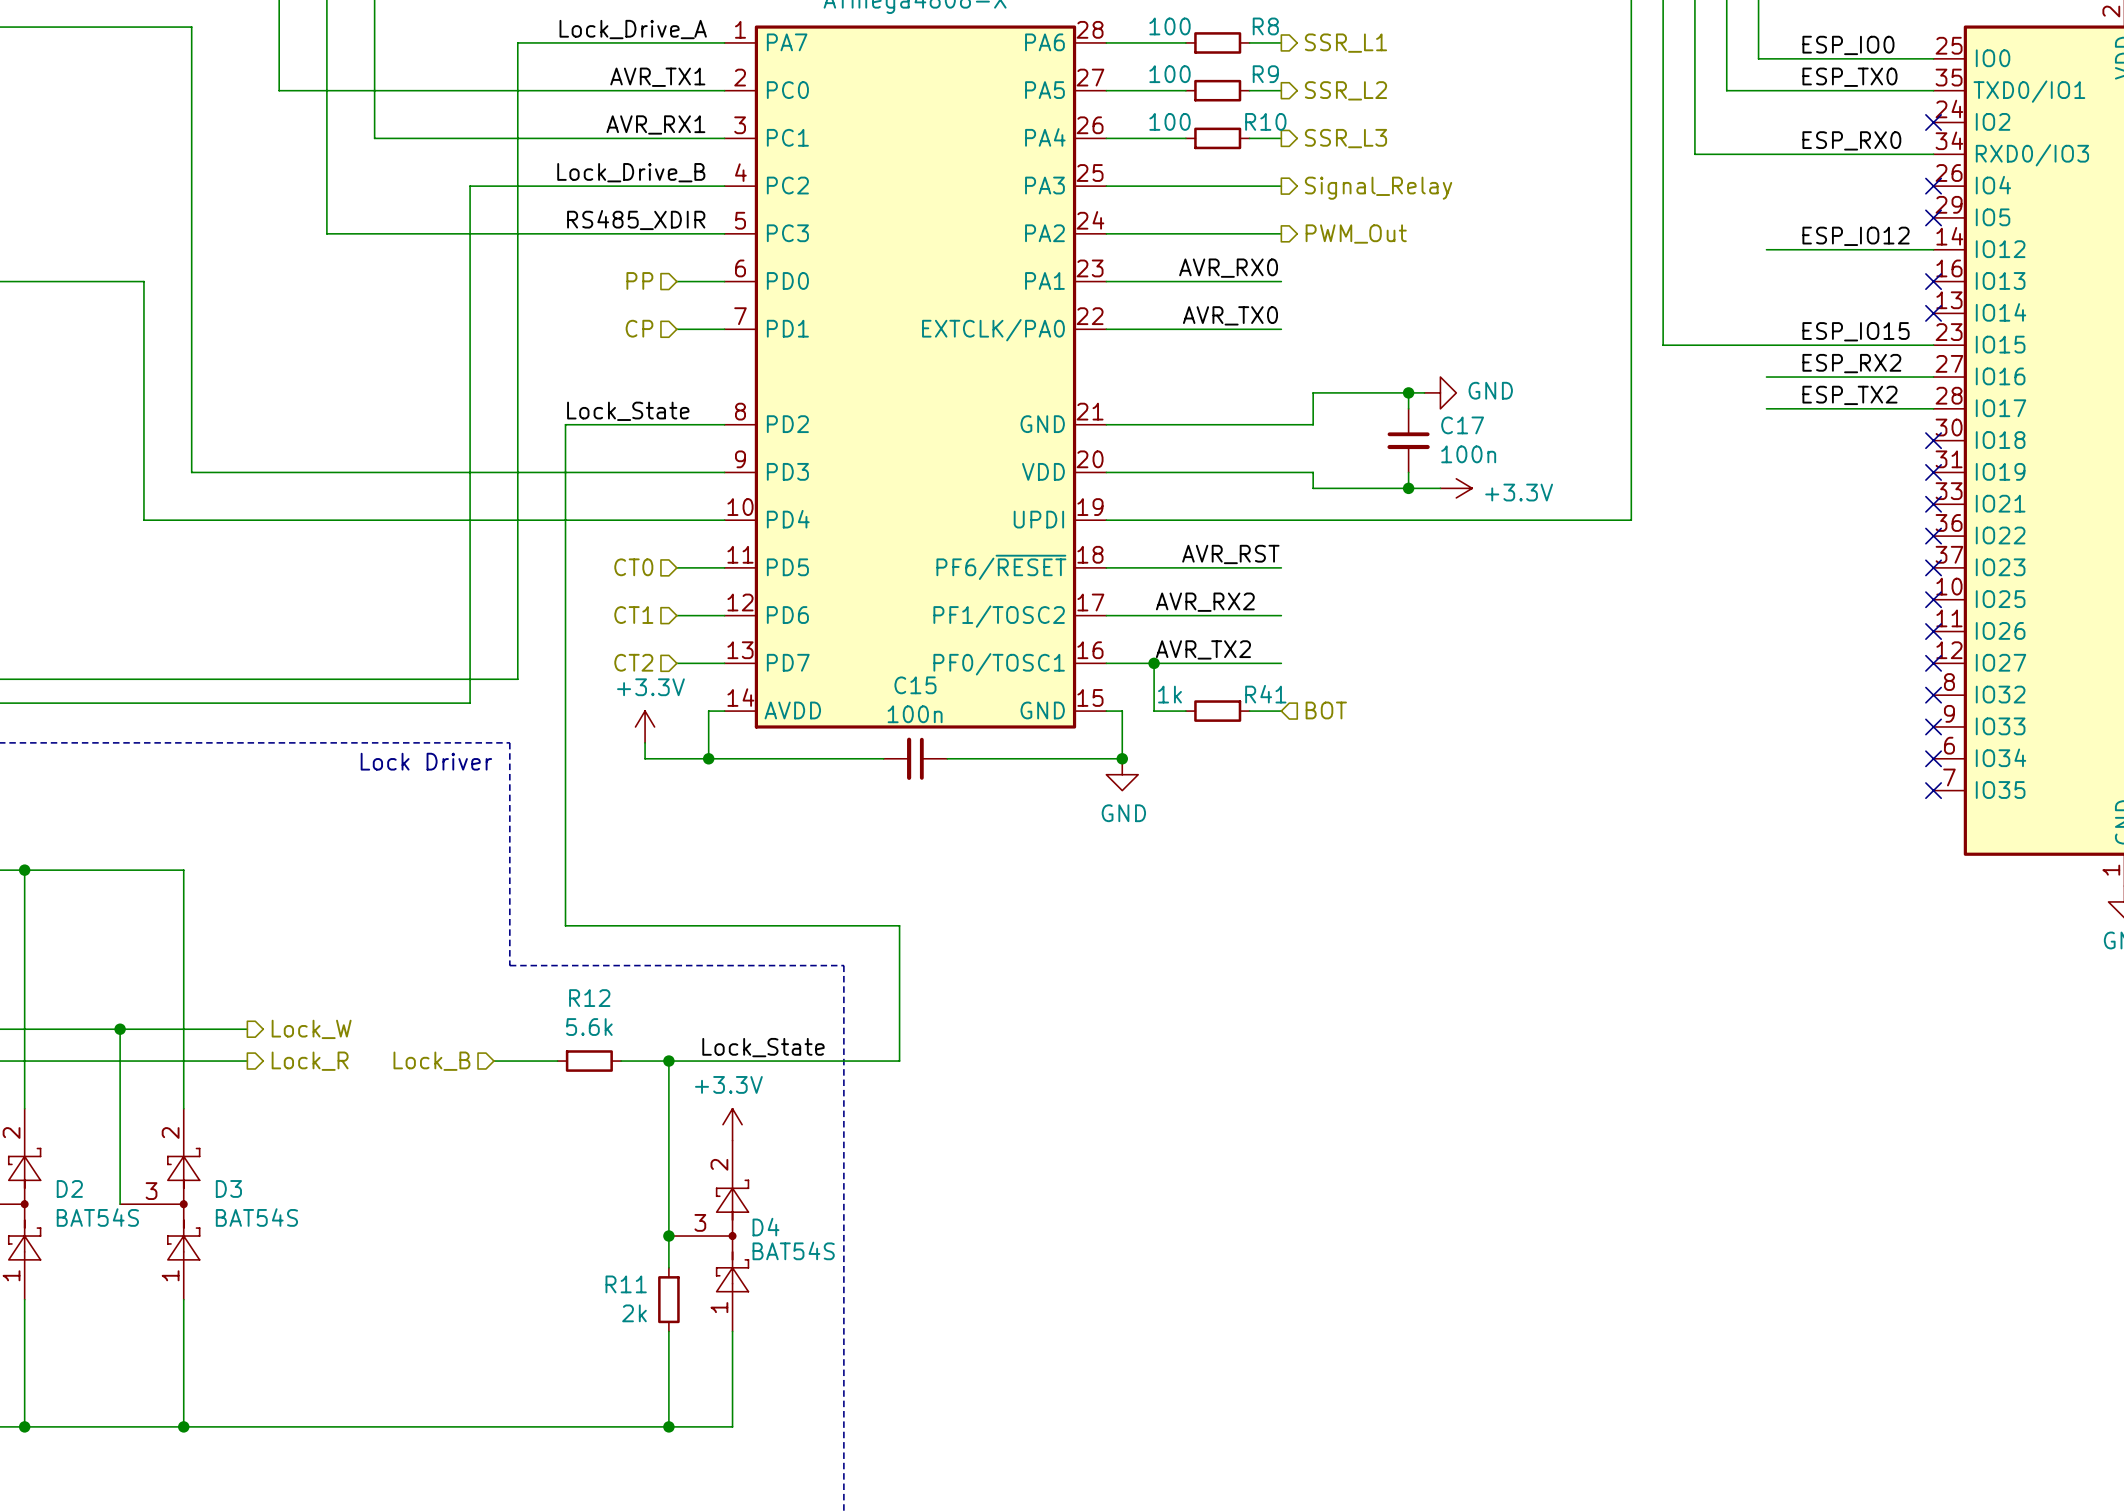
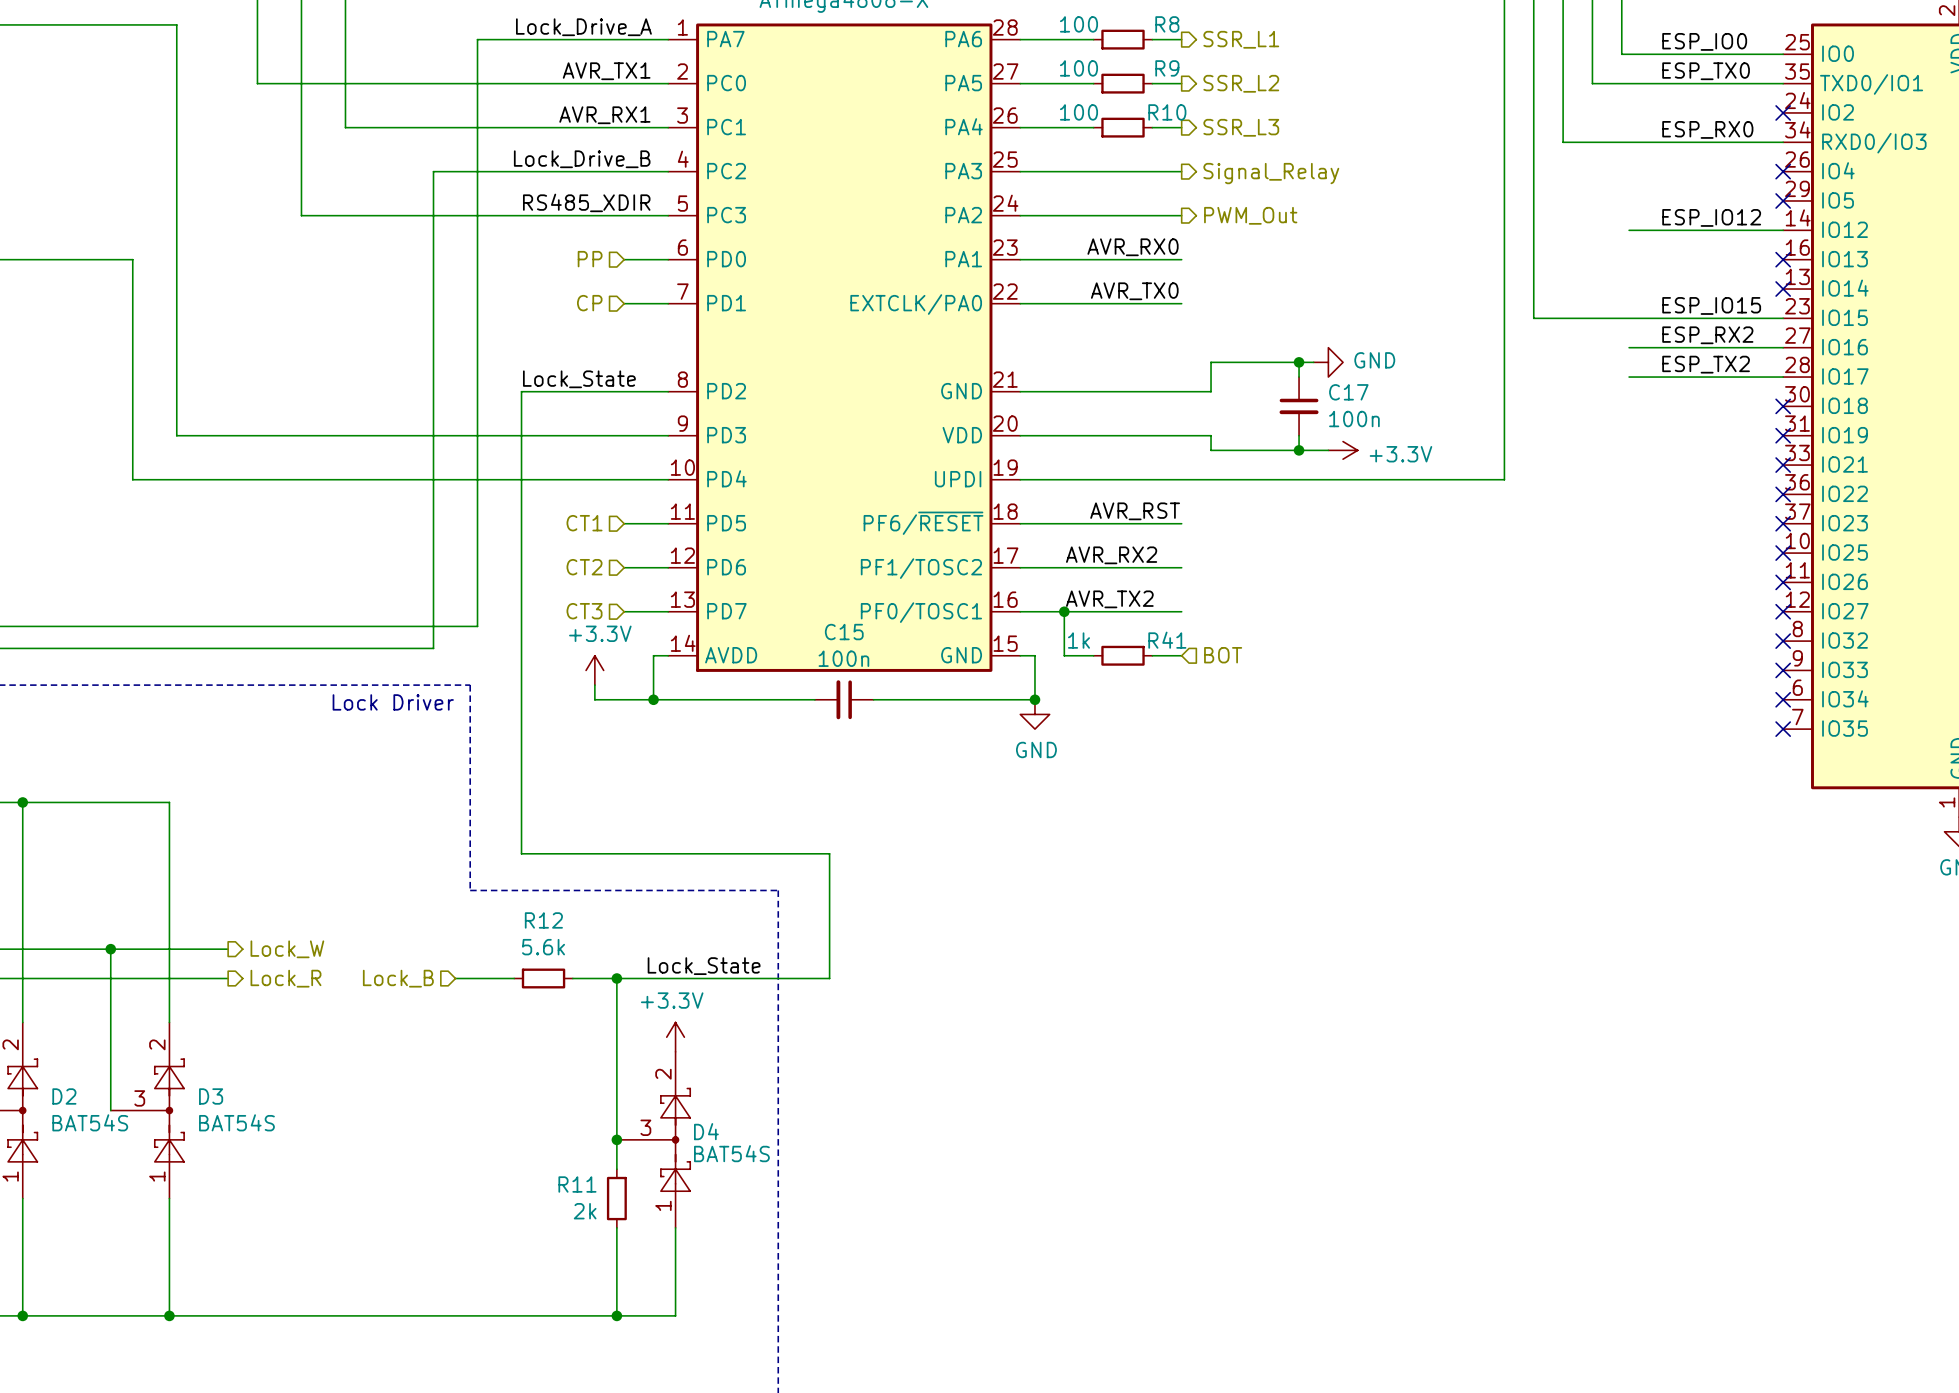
hierarchical label: CT0 (633, 567) -> CT1 (584, 523)
hierarchical label: CT1 (633, 615) -> CT2 (584, 567)
hierarchical label: CT2 (633, 662) -> CT3 (584, 611)

